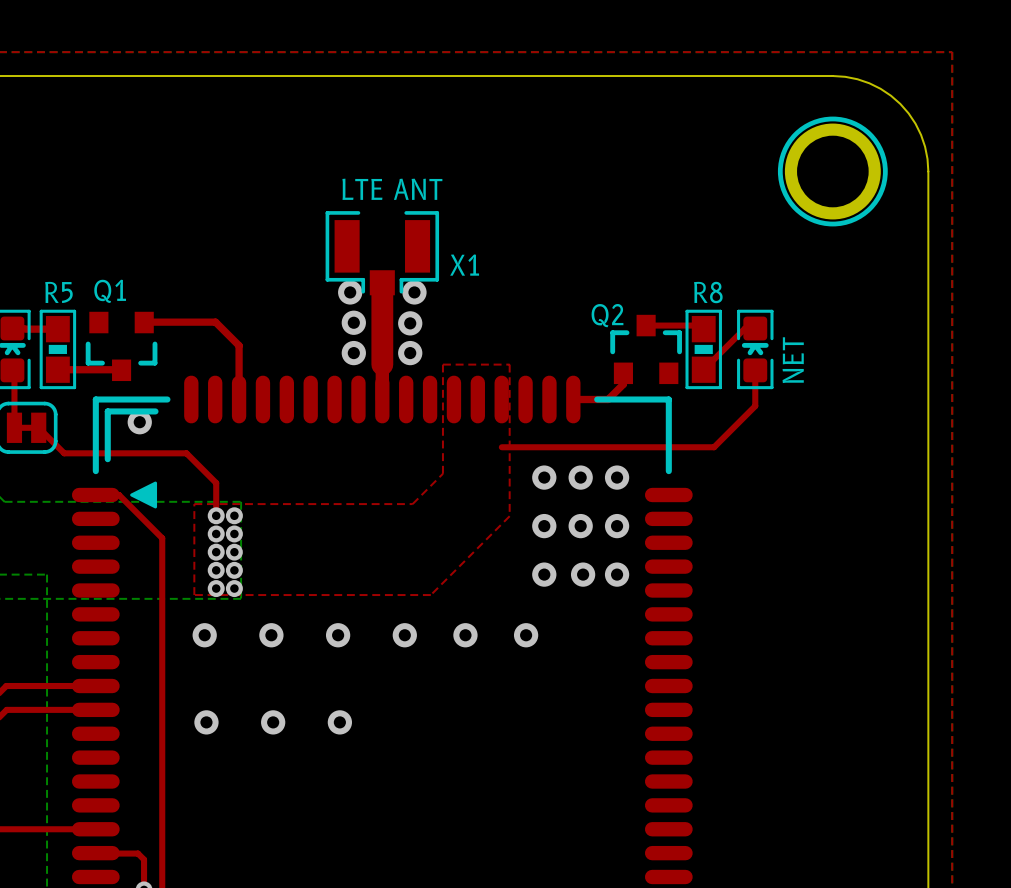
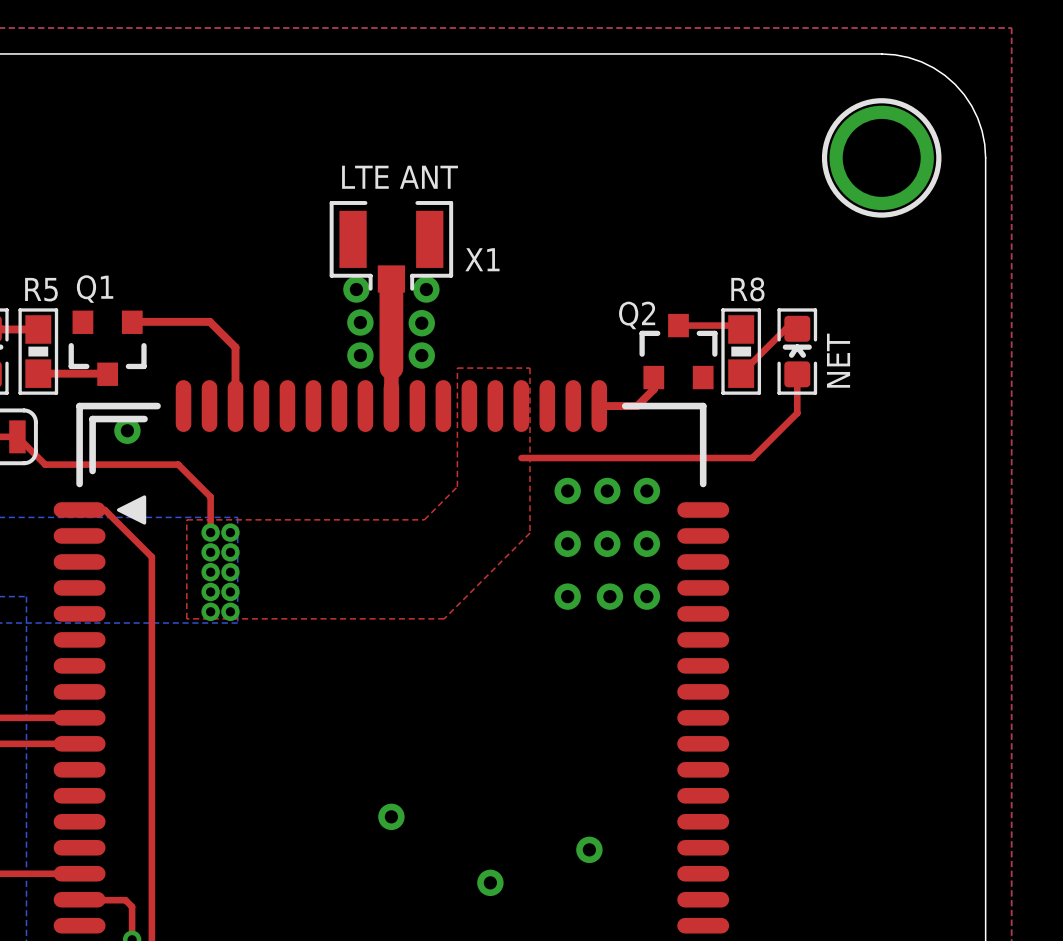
via: (204, 635) -> none
via: (271, 635) -> none
via: (338, 635) -> none
via: (404, 635) -> none
via: (465, 635) -> none
via: (526, 635) -> none
via: (206, 722) -> none
via: (273, 722) -> none
via: (339, 722) -> none
via: none -> (391, 816)
via: none -> (589, 849)
via: none -> (490, 882)

